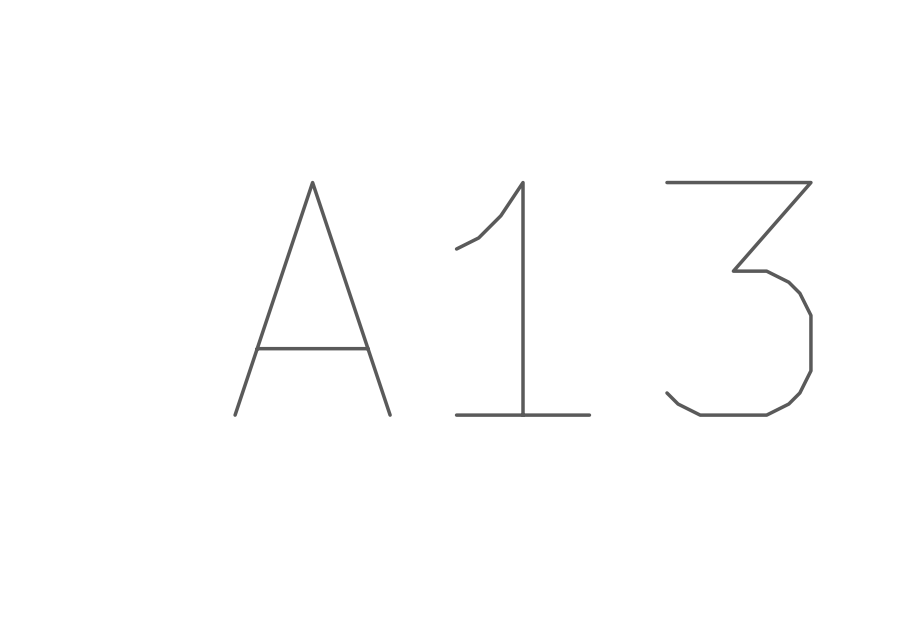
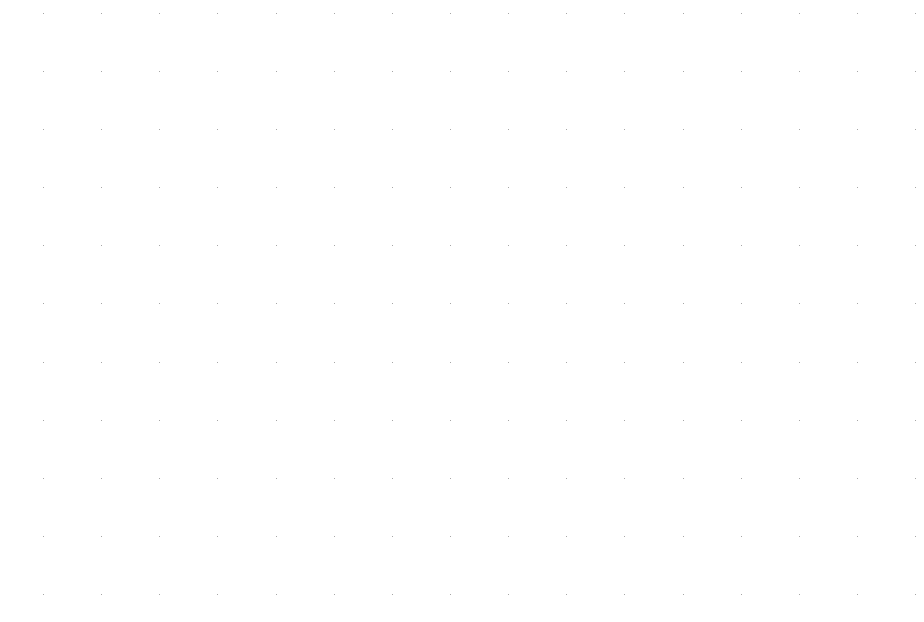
text: A13 (523, 298) -> none

